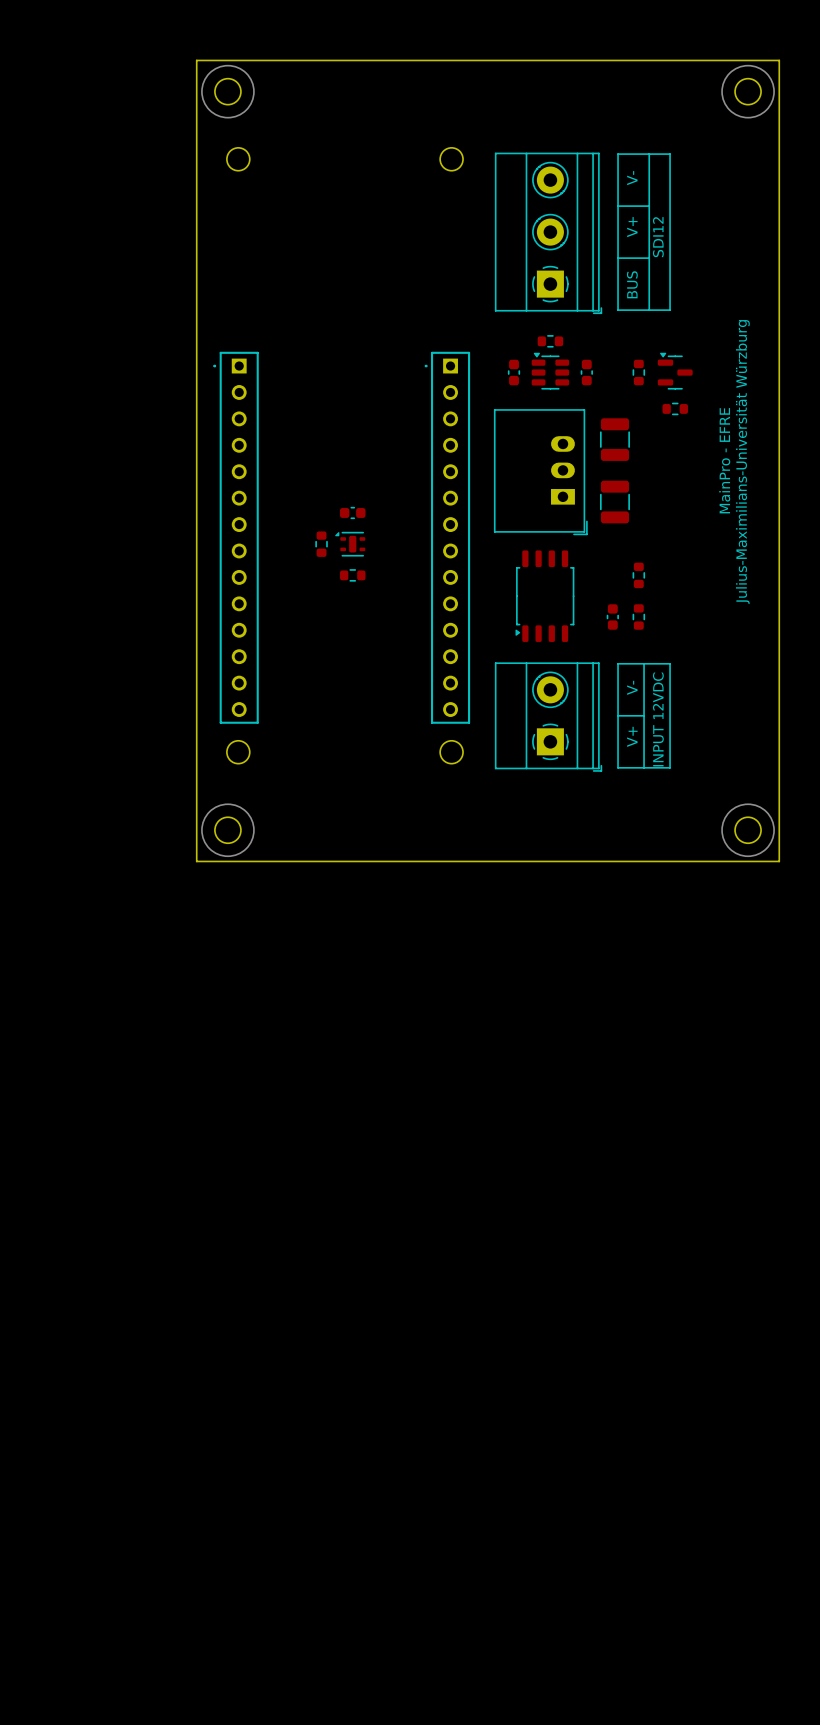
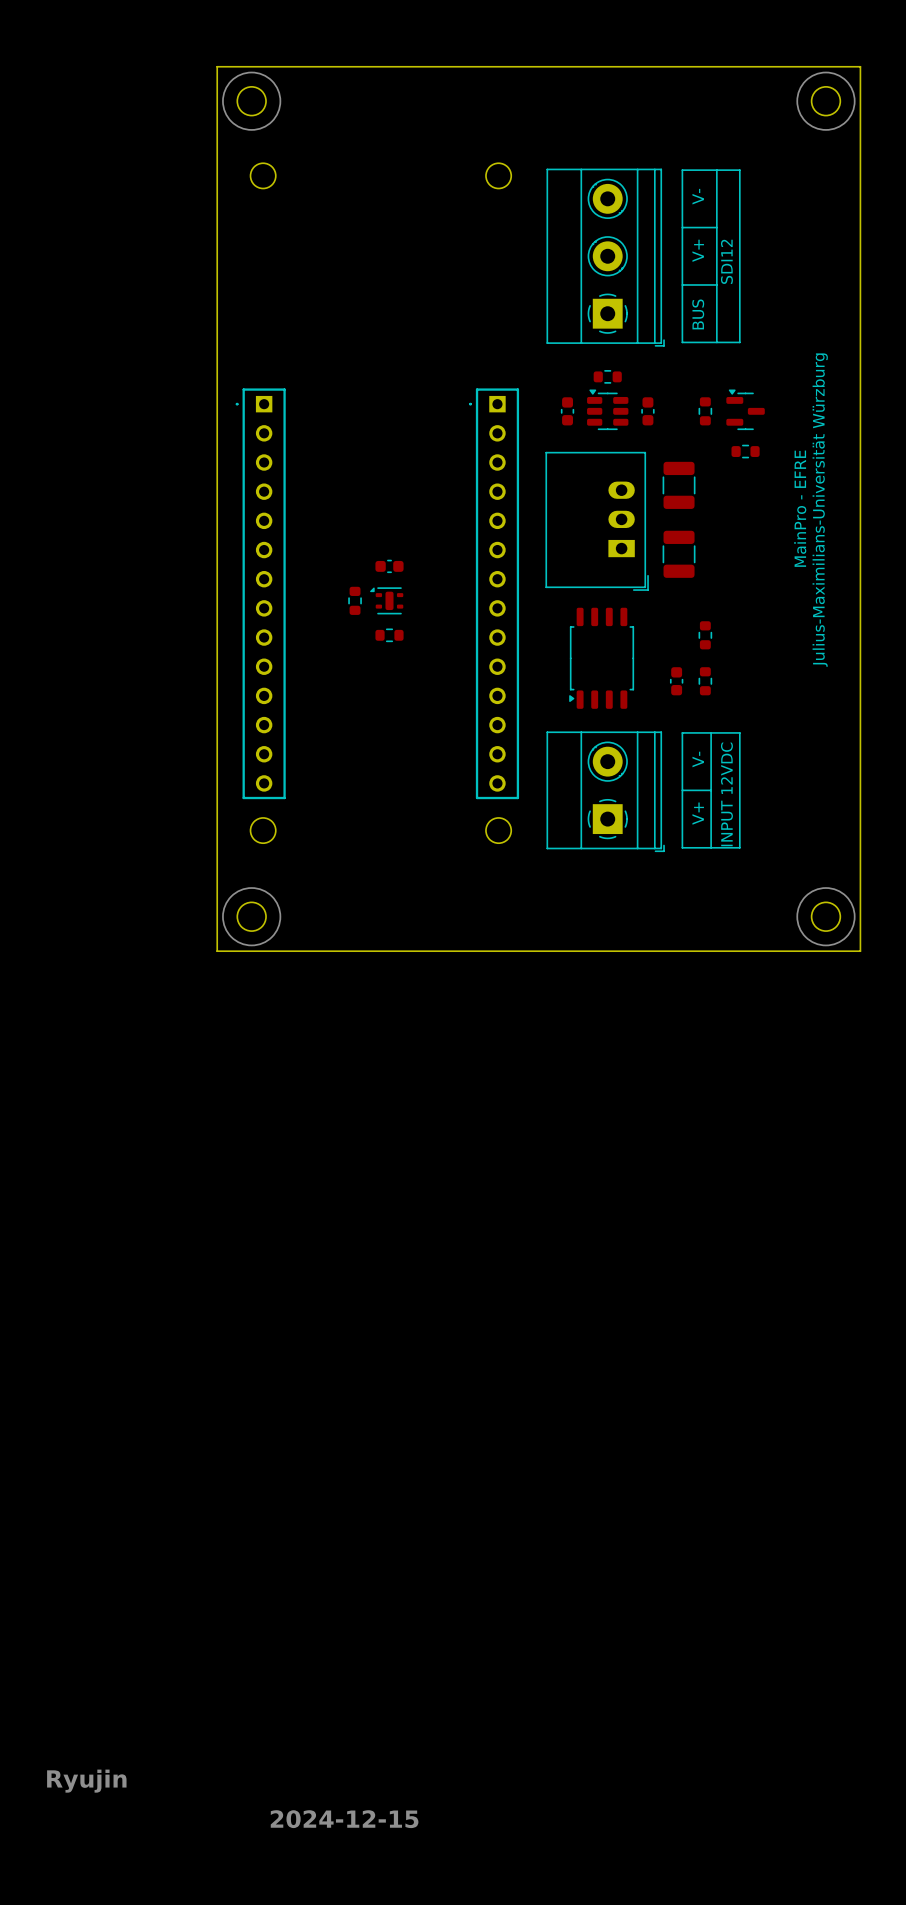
text: none -> Ryujin (86, 1781)
text: none -> 2024-12-15 (344, 1819)

